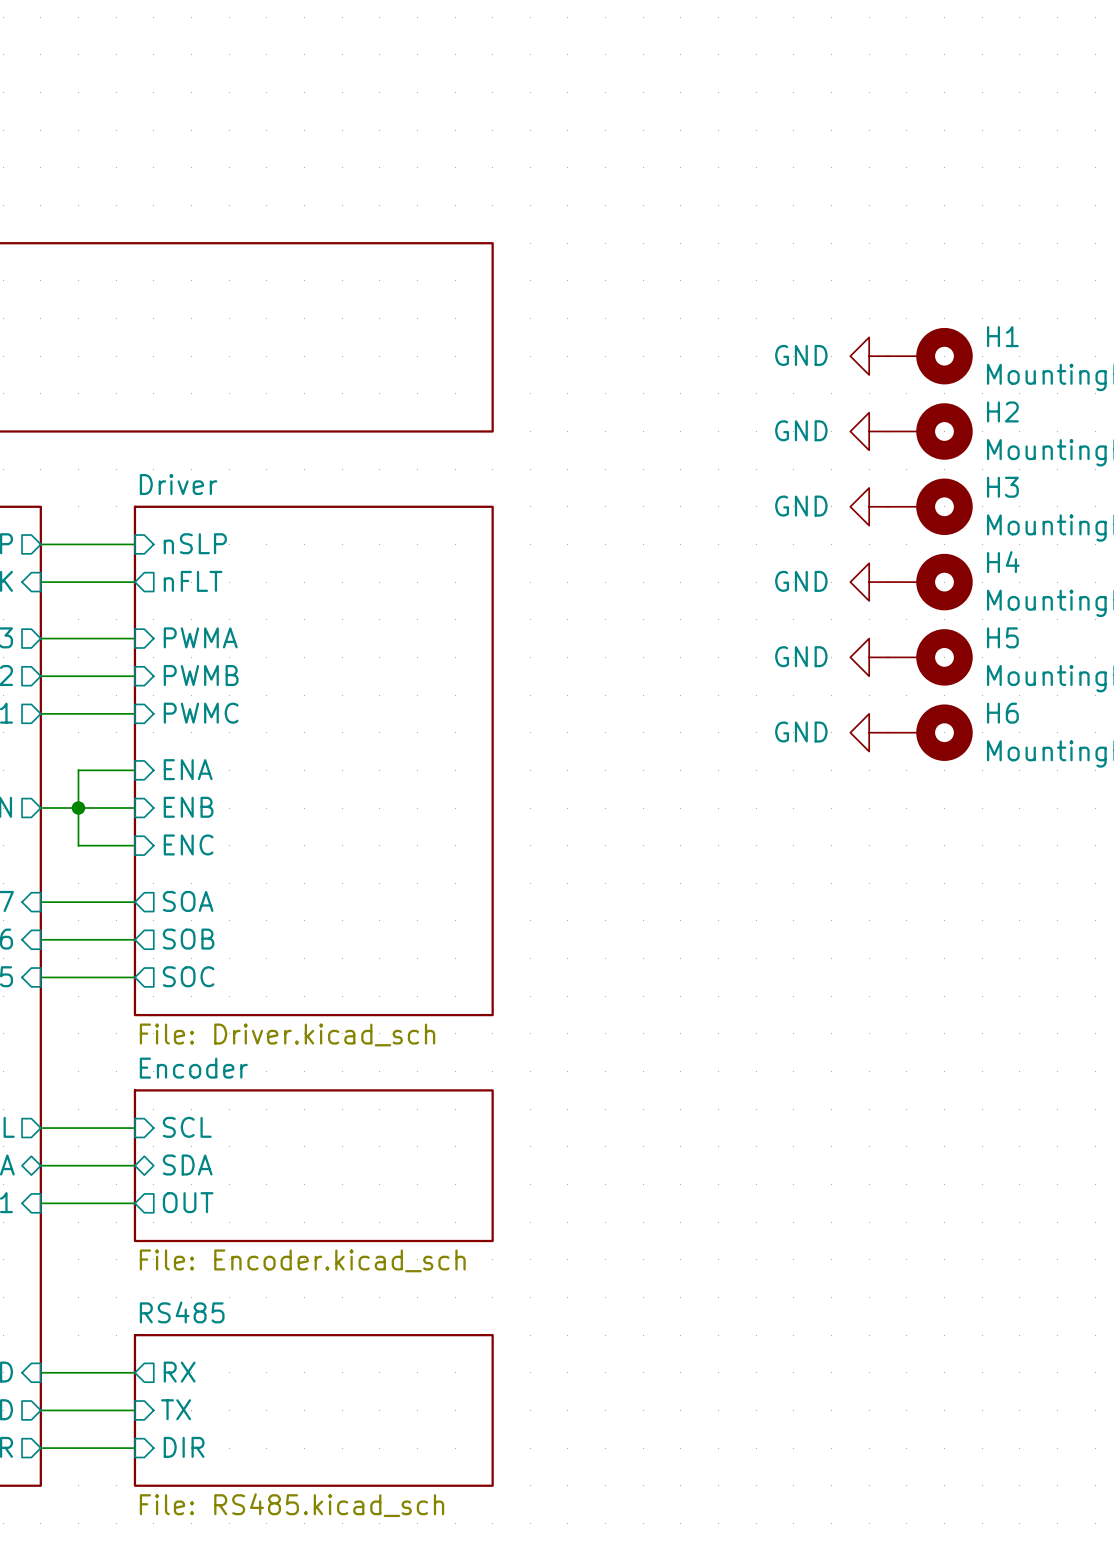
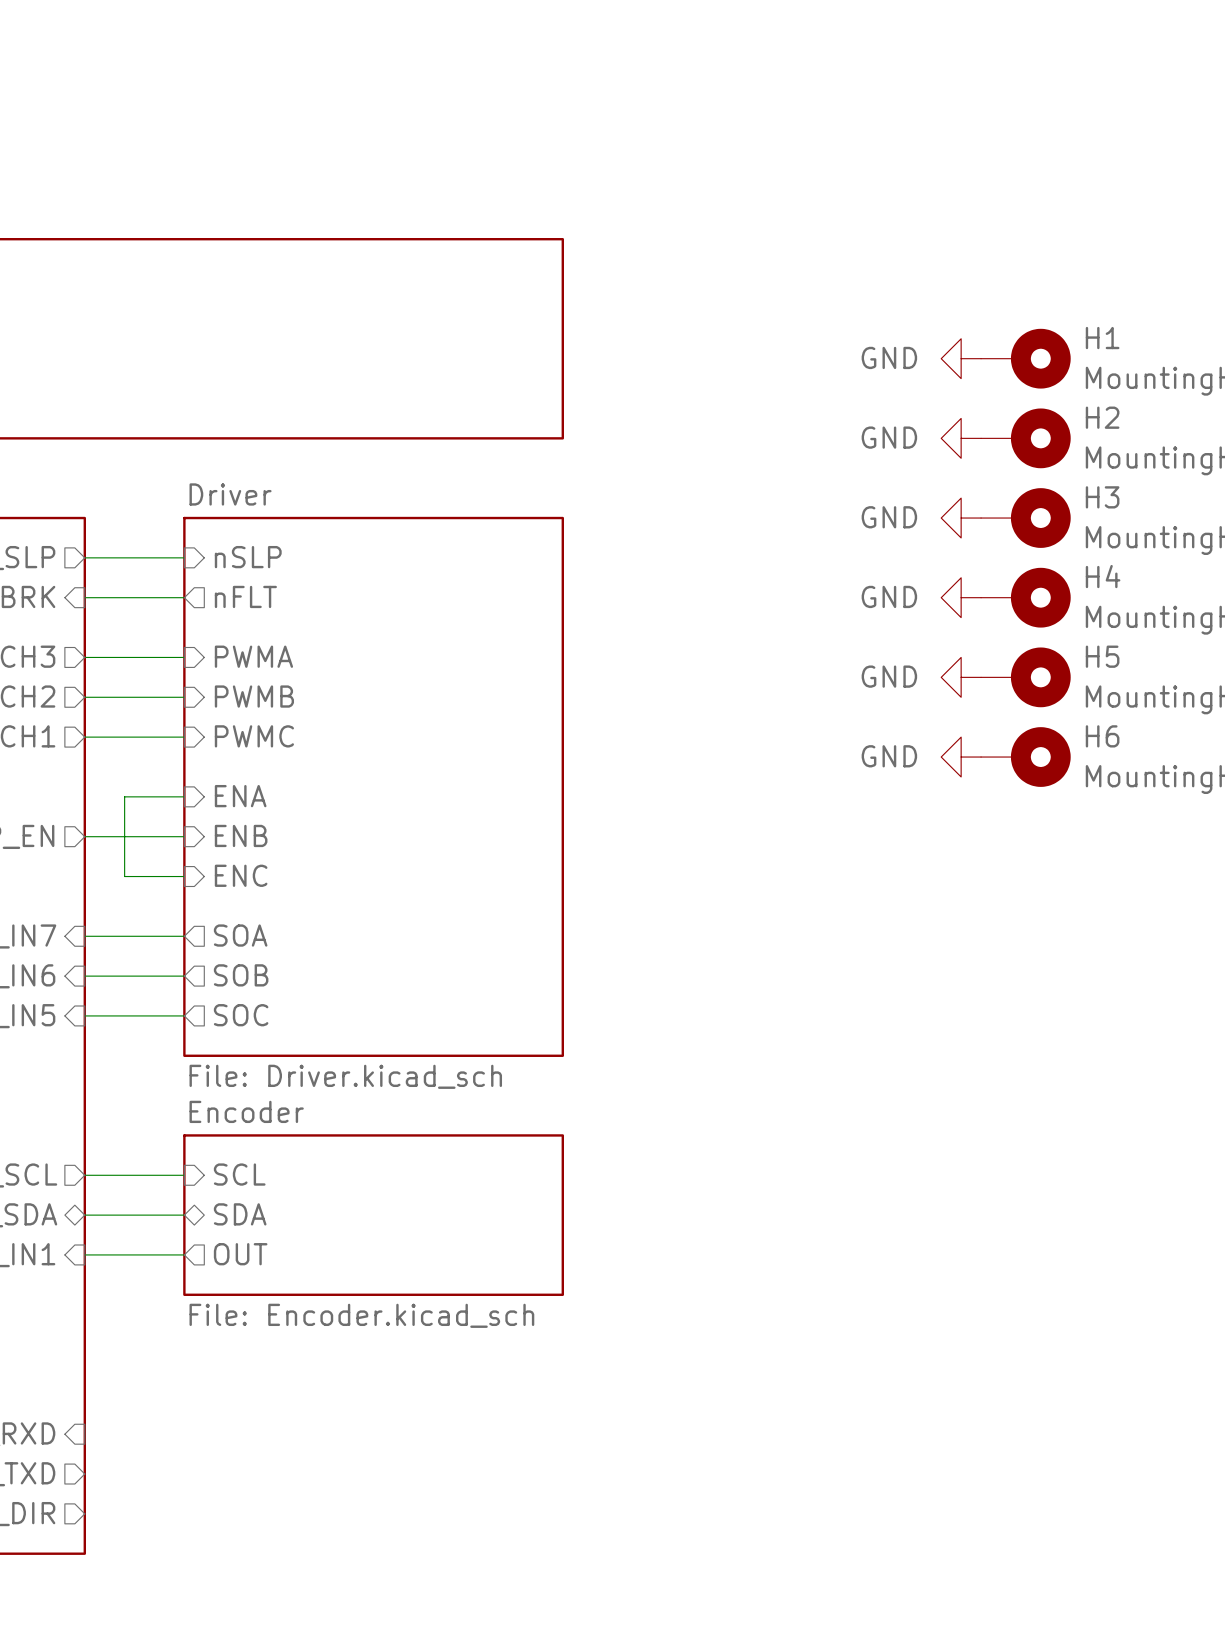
junction: (78, 808) -> none
wire: (40, 1372) (134, 1372) -> none
sheet pin: RX (179, 1372) -> none
sheet pin: TX (176, 1409) -> none
wire: (40, 1410) (134, 1410) -> none
sheet RS485: File: RS485.kicad_sch (313, 1410) -> none
sheet pin: DIR (184, 1447) -> none
wire: (40, 1448) (134, 1448) -> none

